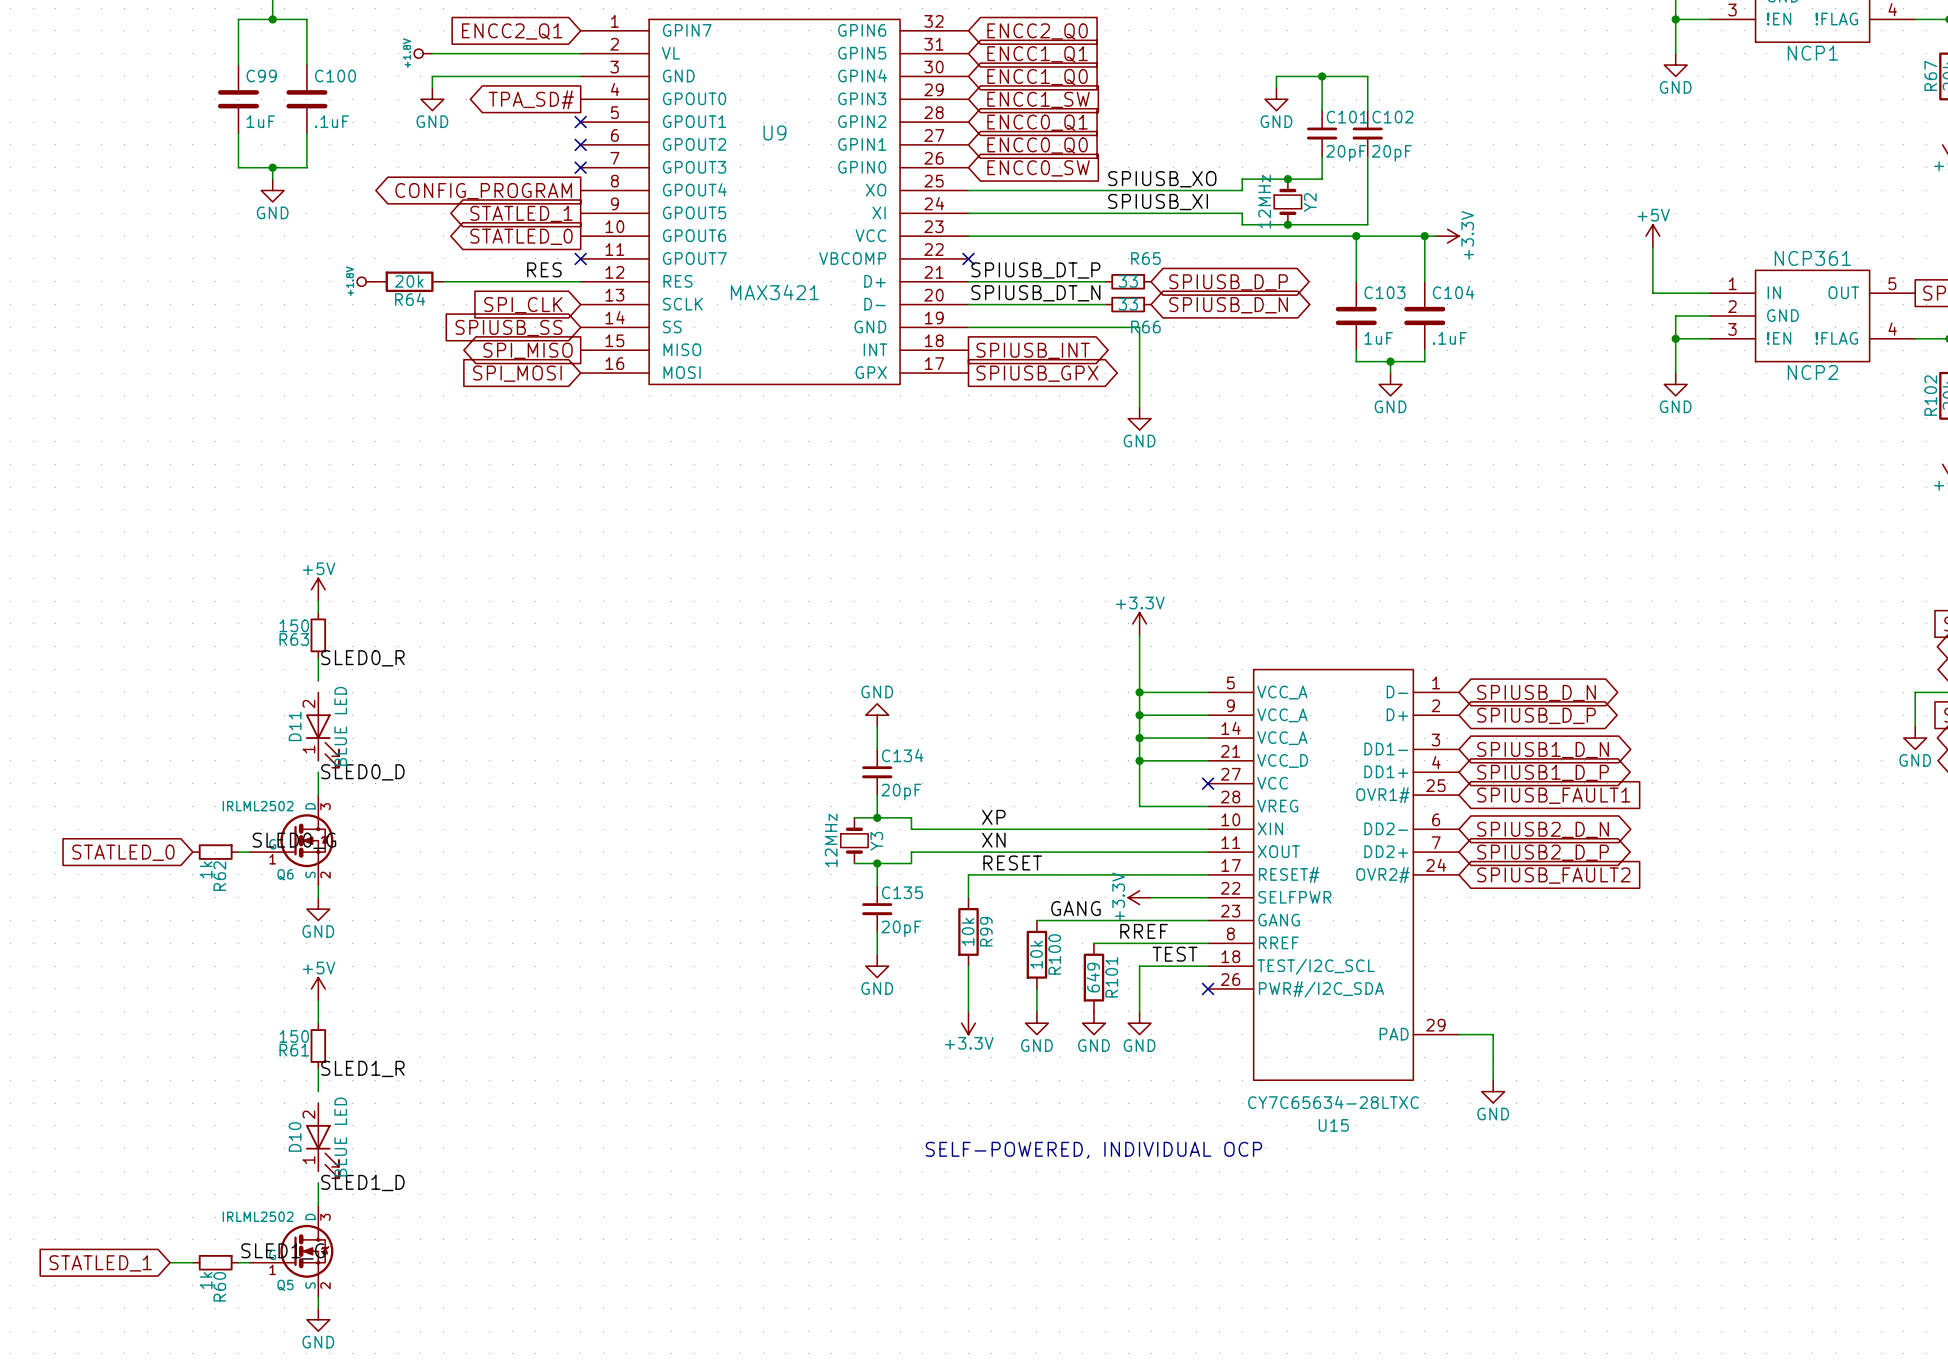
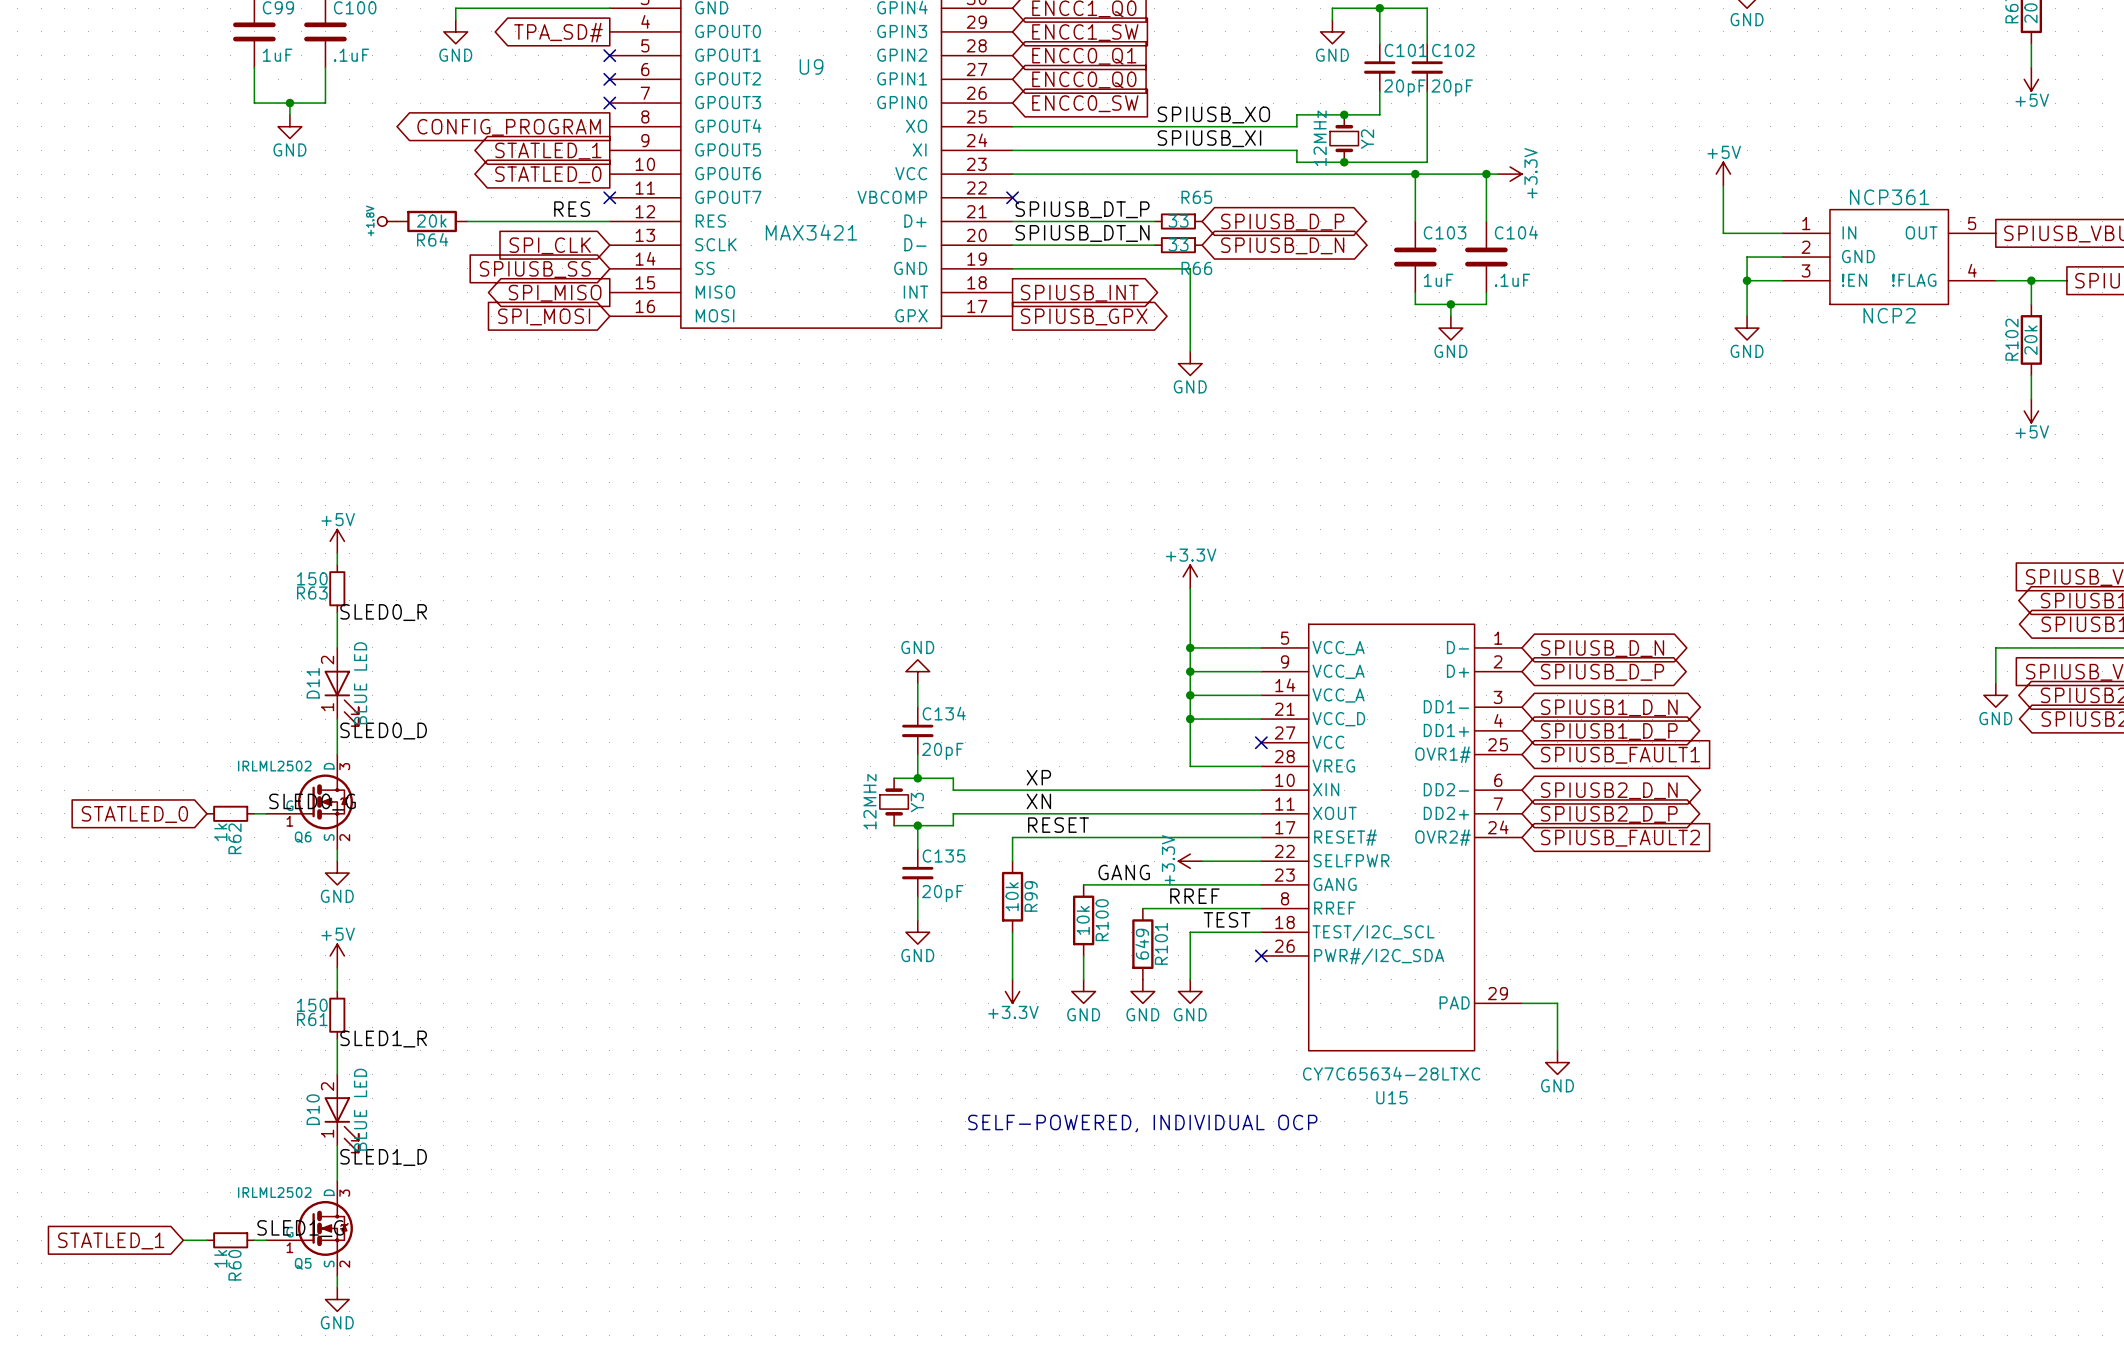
wire: none -> (337, 636) (337, 647)
wire: none -> (337, 719) (337, 730)
wire: none -> (337, 1062) (337, 1074)
wire: none -> (337, 1145) (337, 1157)

